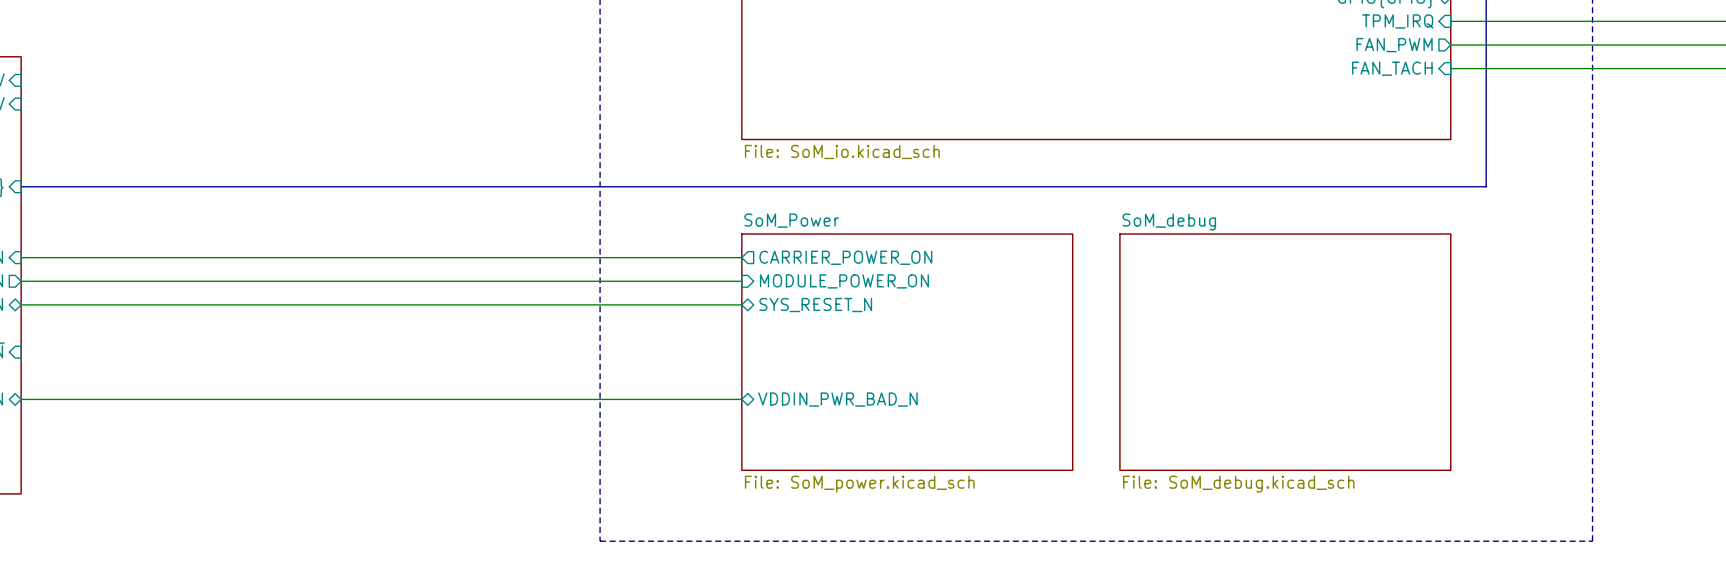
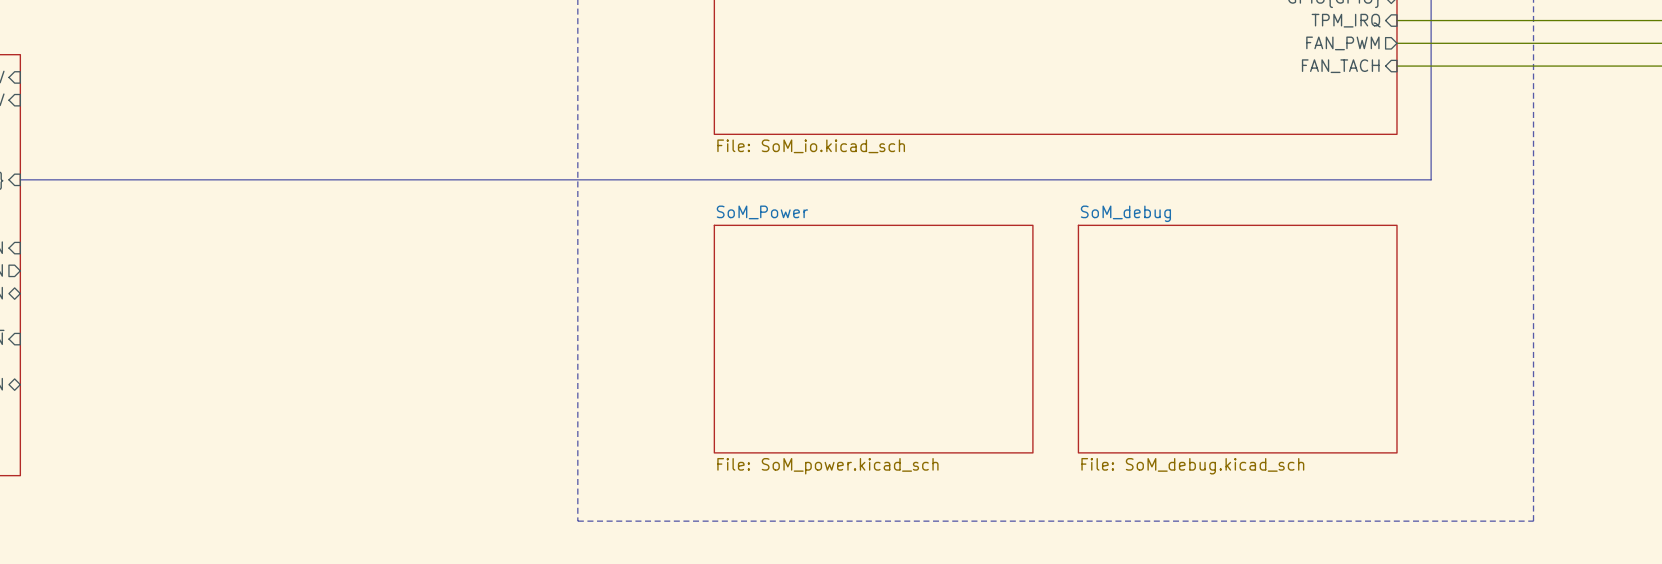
wire: (21, 257) (741, 257) -> none
sheet pin: CARRIER_POWER_ON (845, 257) -> none
wire: (21, 281) (741, 281) -> none
sheet pin: MODULE_POWER_ON (844, 281) -> none
wire: (21, 304) (741, 304) -> none
sheet pin: SYS_RESET_N (815, 305) -> none
wire: (21, 399) (741, 399) -> none
sheet pin: VDDIN_PWR_BAD_N (837, 399) -> none

